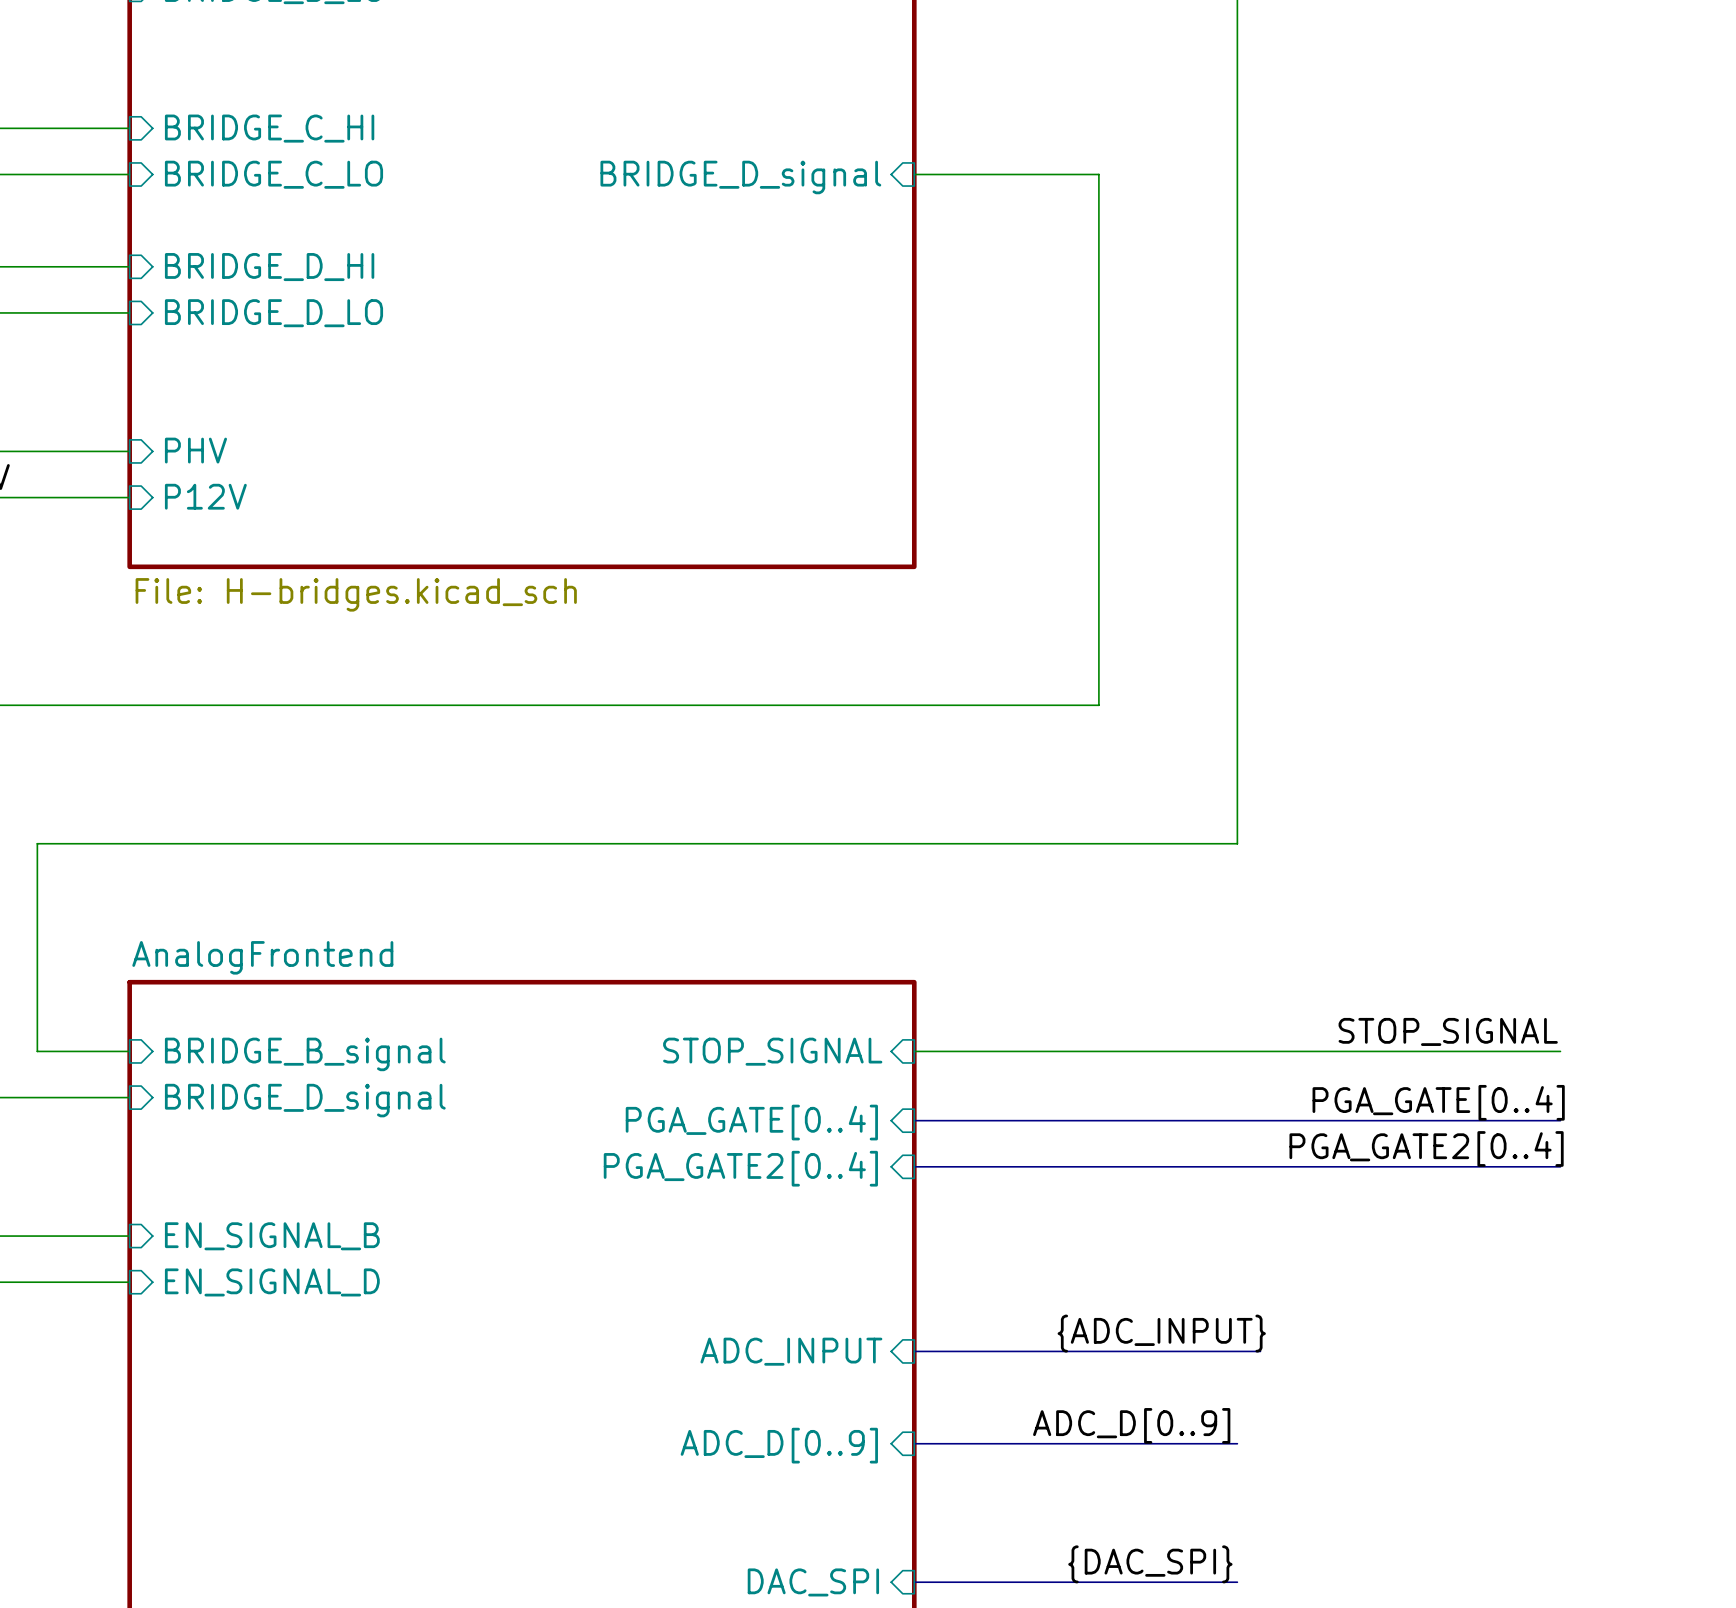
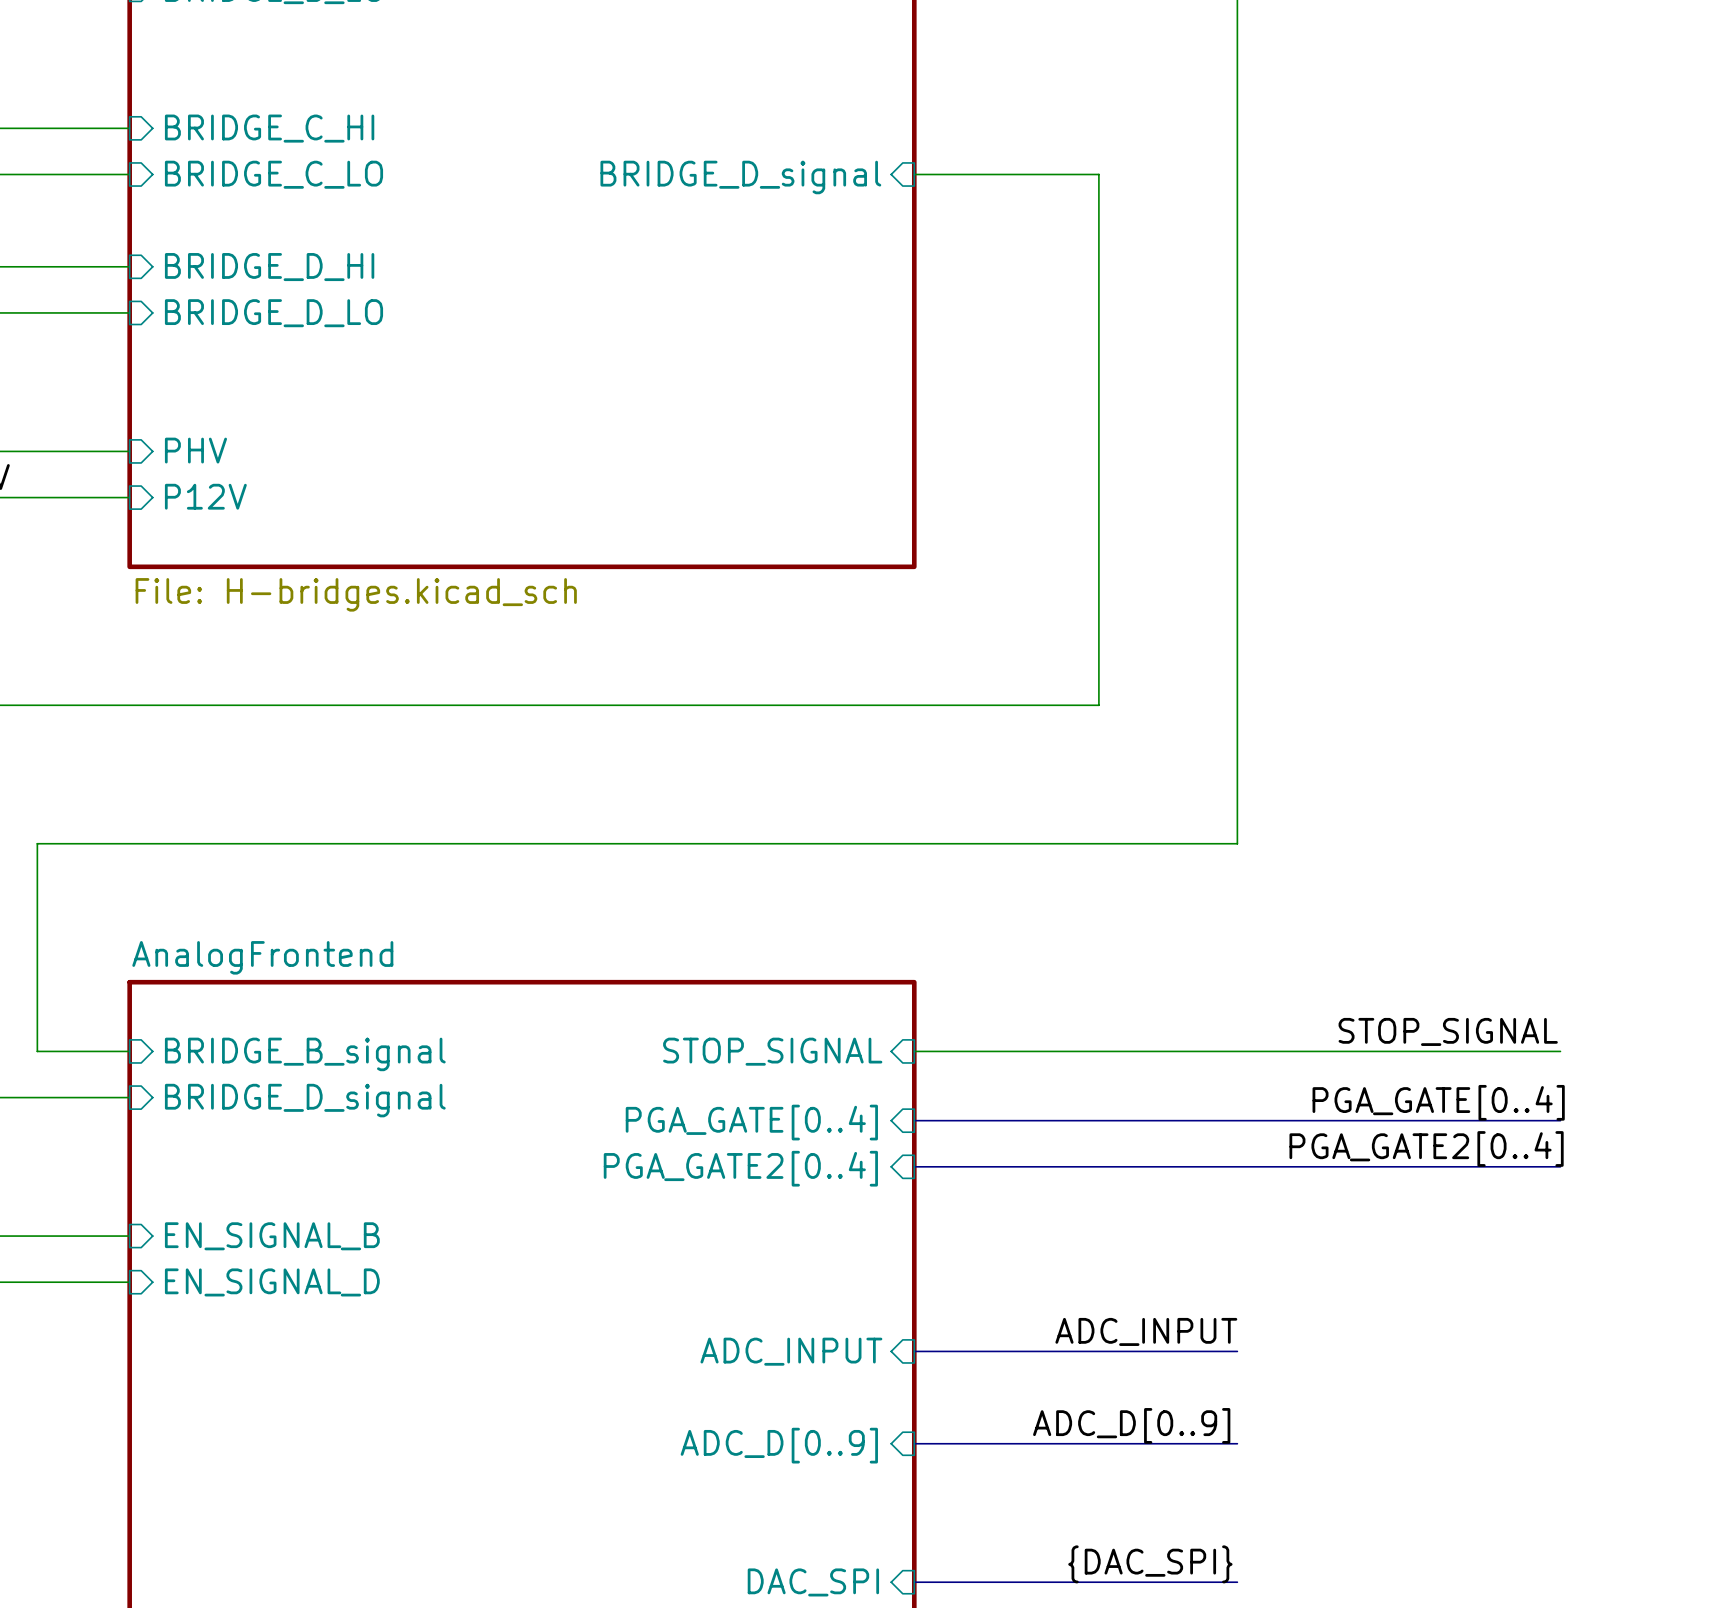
label: {ADC_INPUT} (1161, 1333) -> ADC_INPUT (1146, 1331)
bus: (1237, 1351) (1260, 1351) -> none

